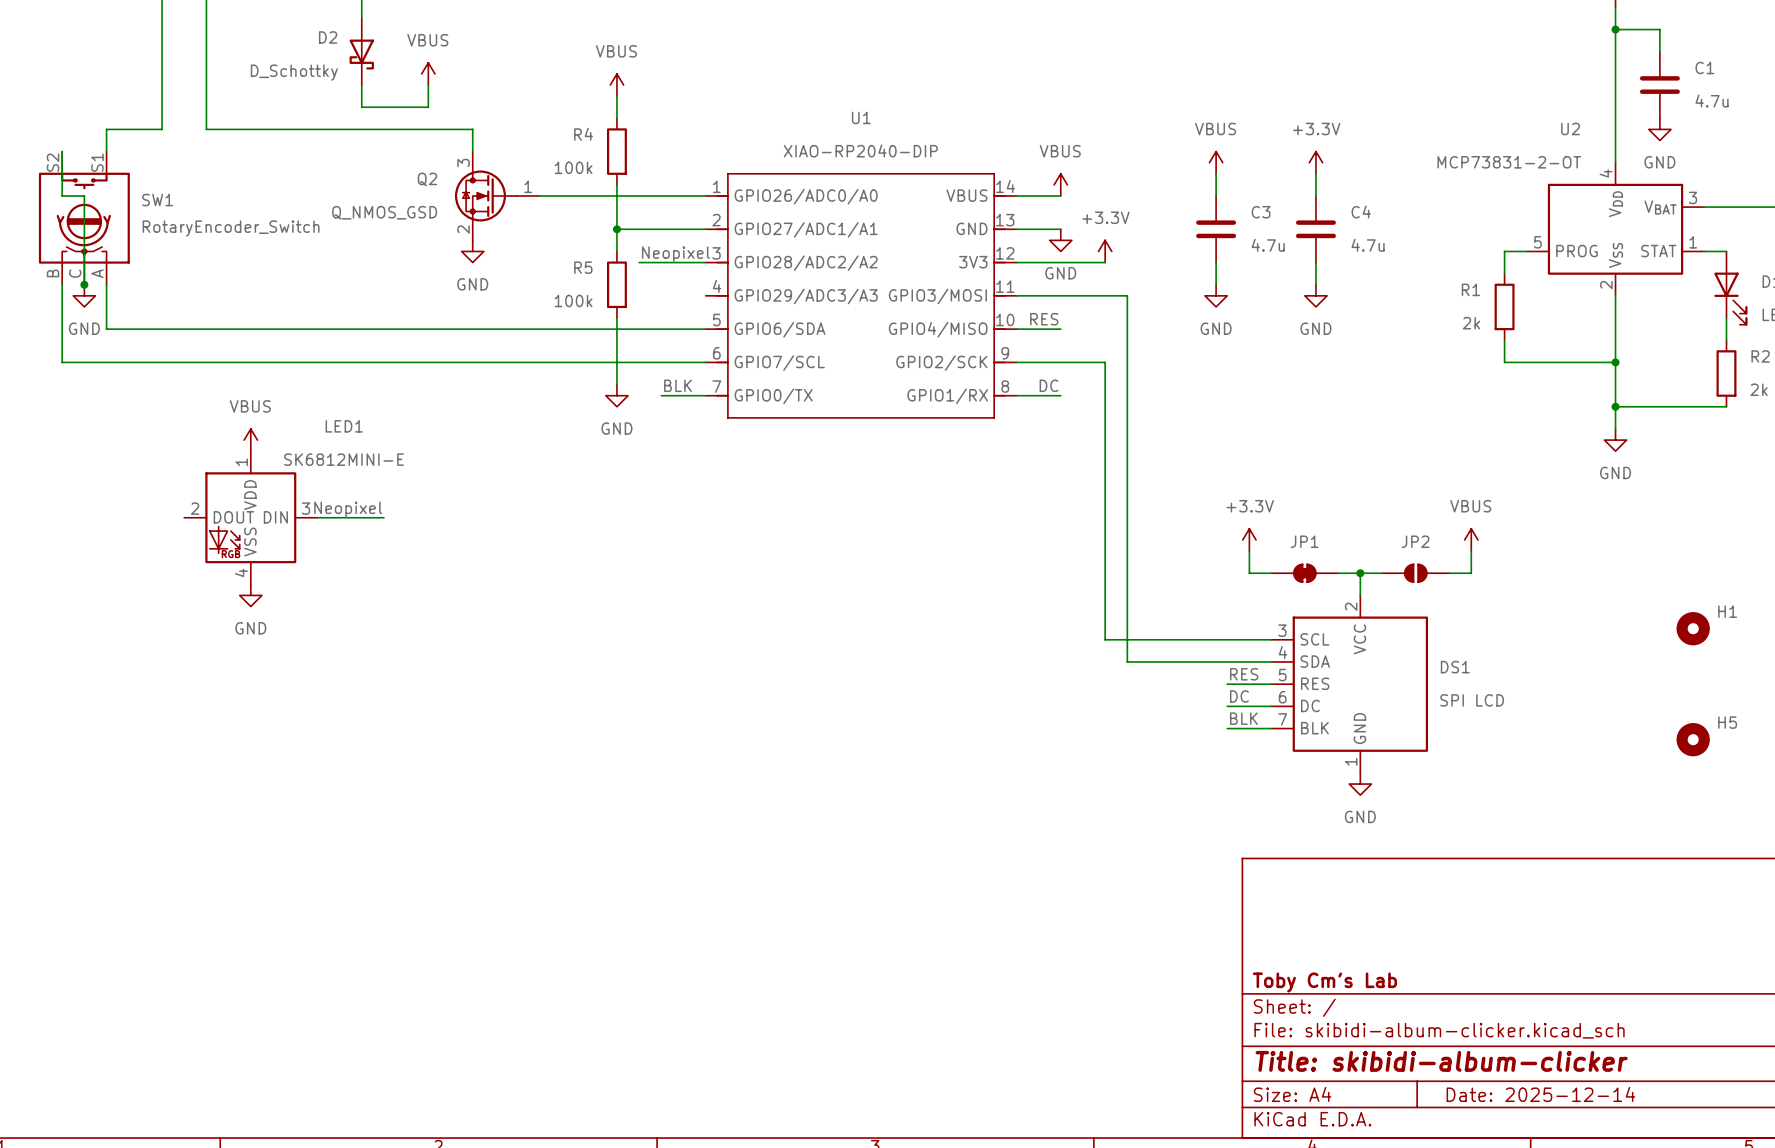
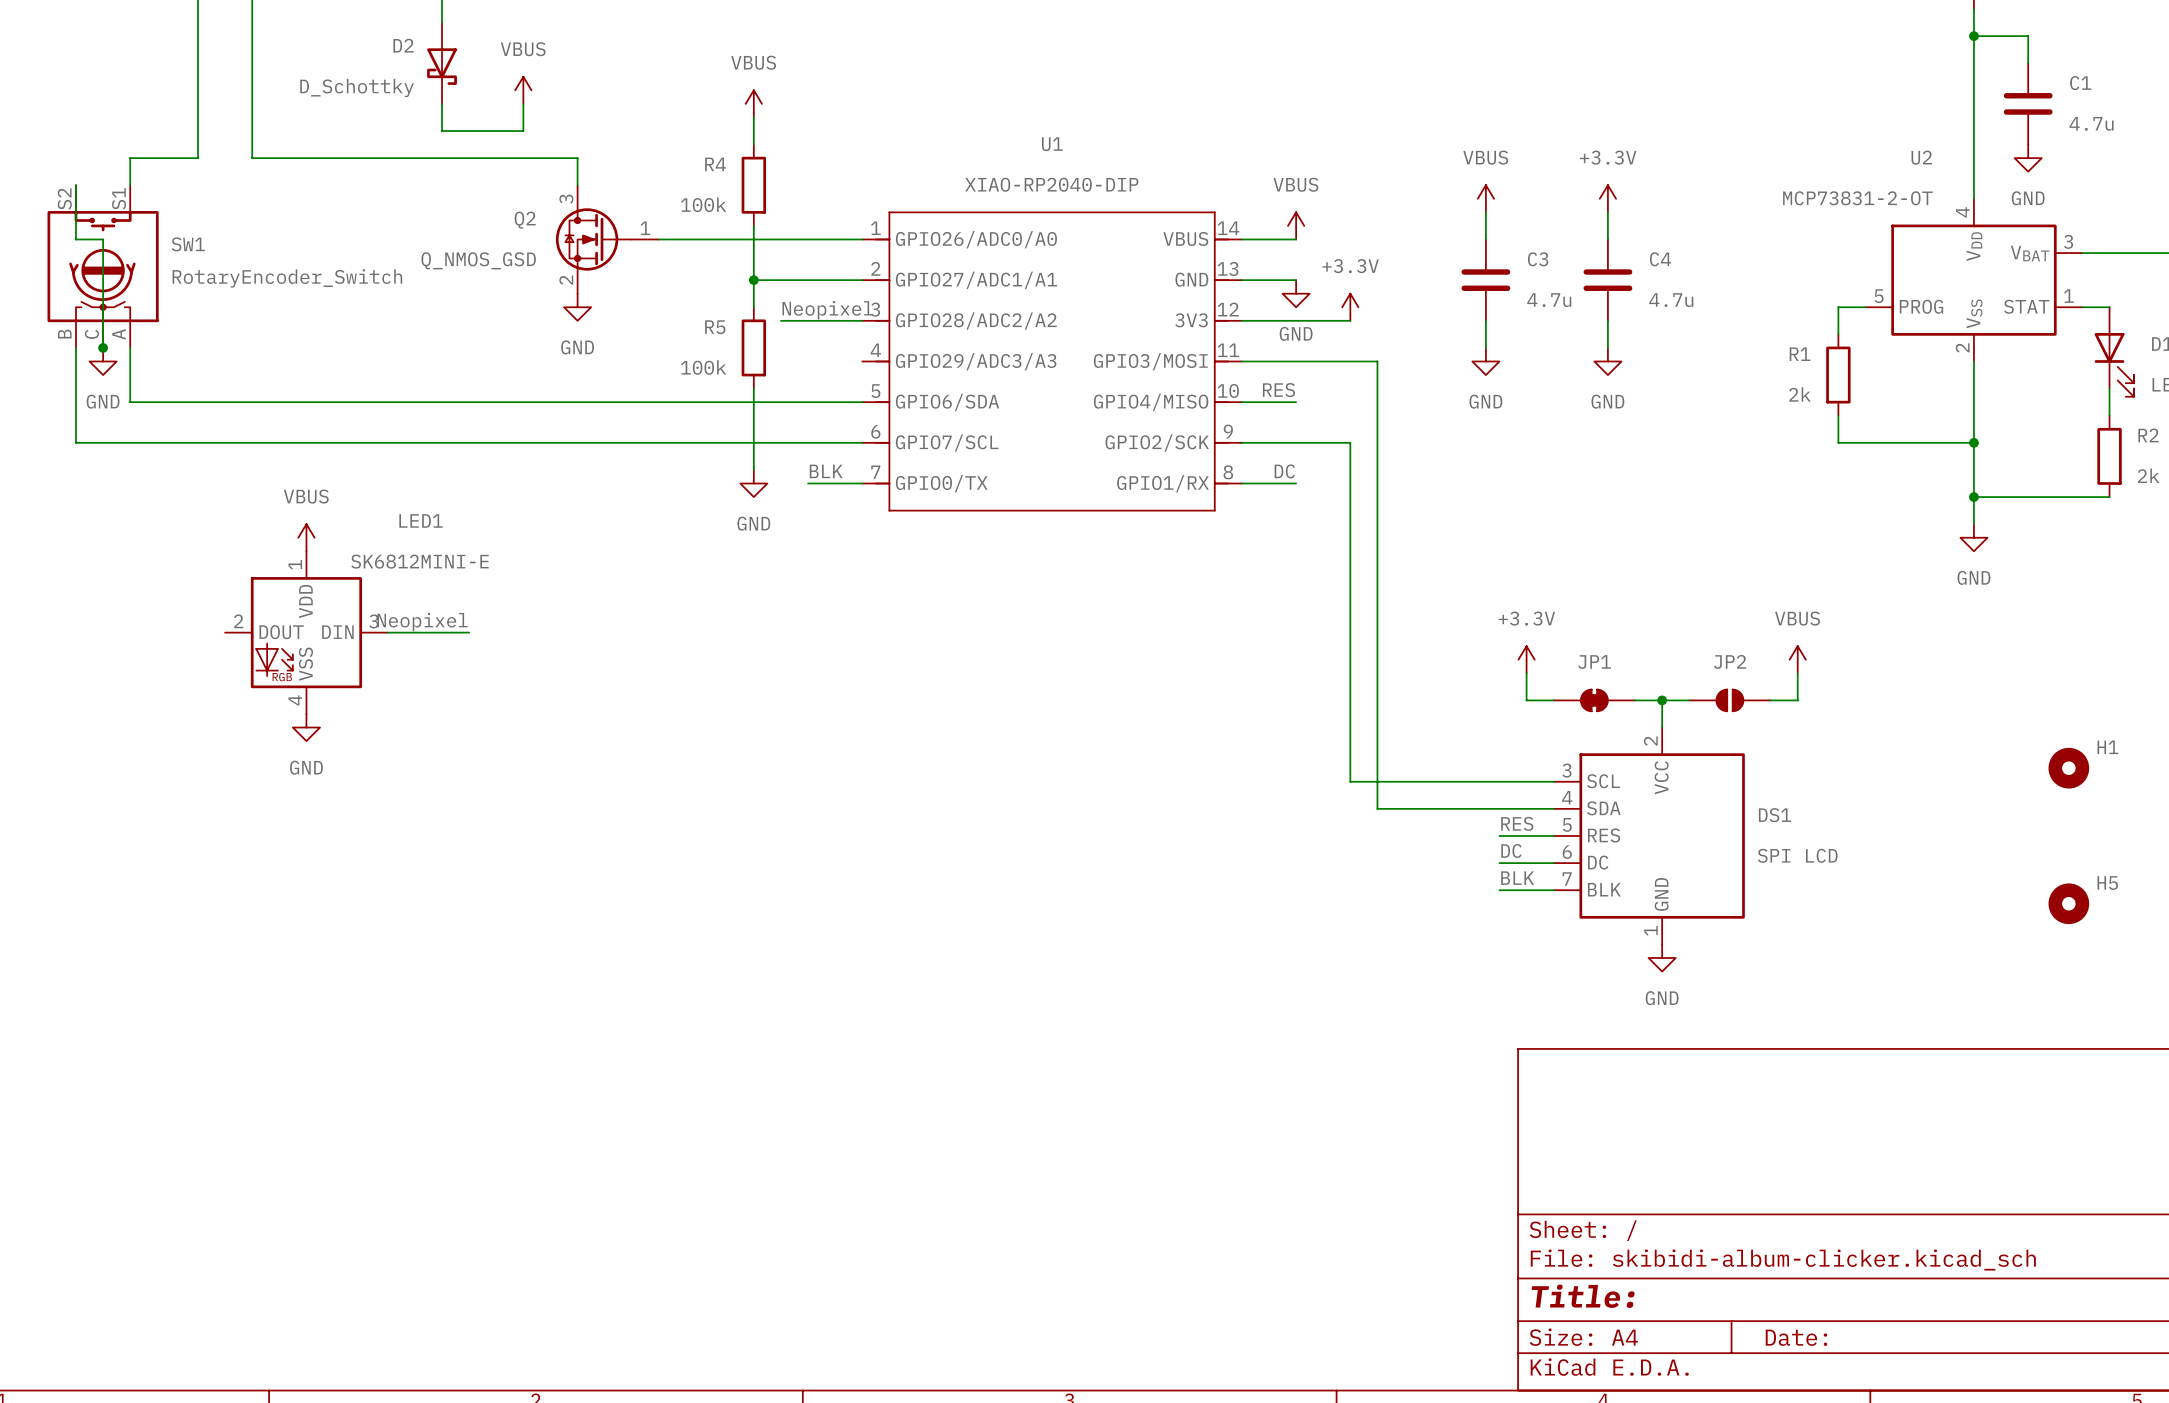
title block: Toby Cm's Lab (1324, 982) -> none
title block: Title: skibidi-album-clicker (1441, 1061) -> Title: (1583, 1296)
title block: Date: 2025-12-14 (1540, 1094) -> Date: (1796, 1337)

